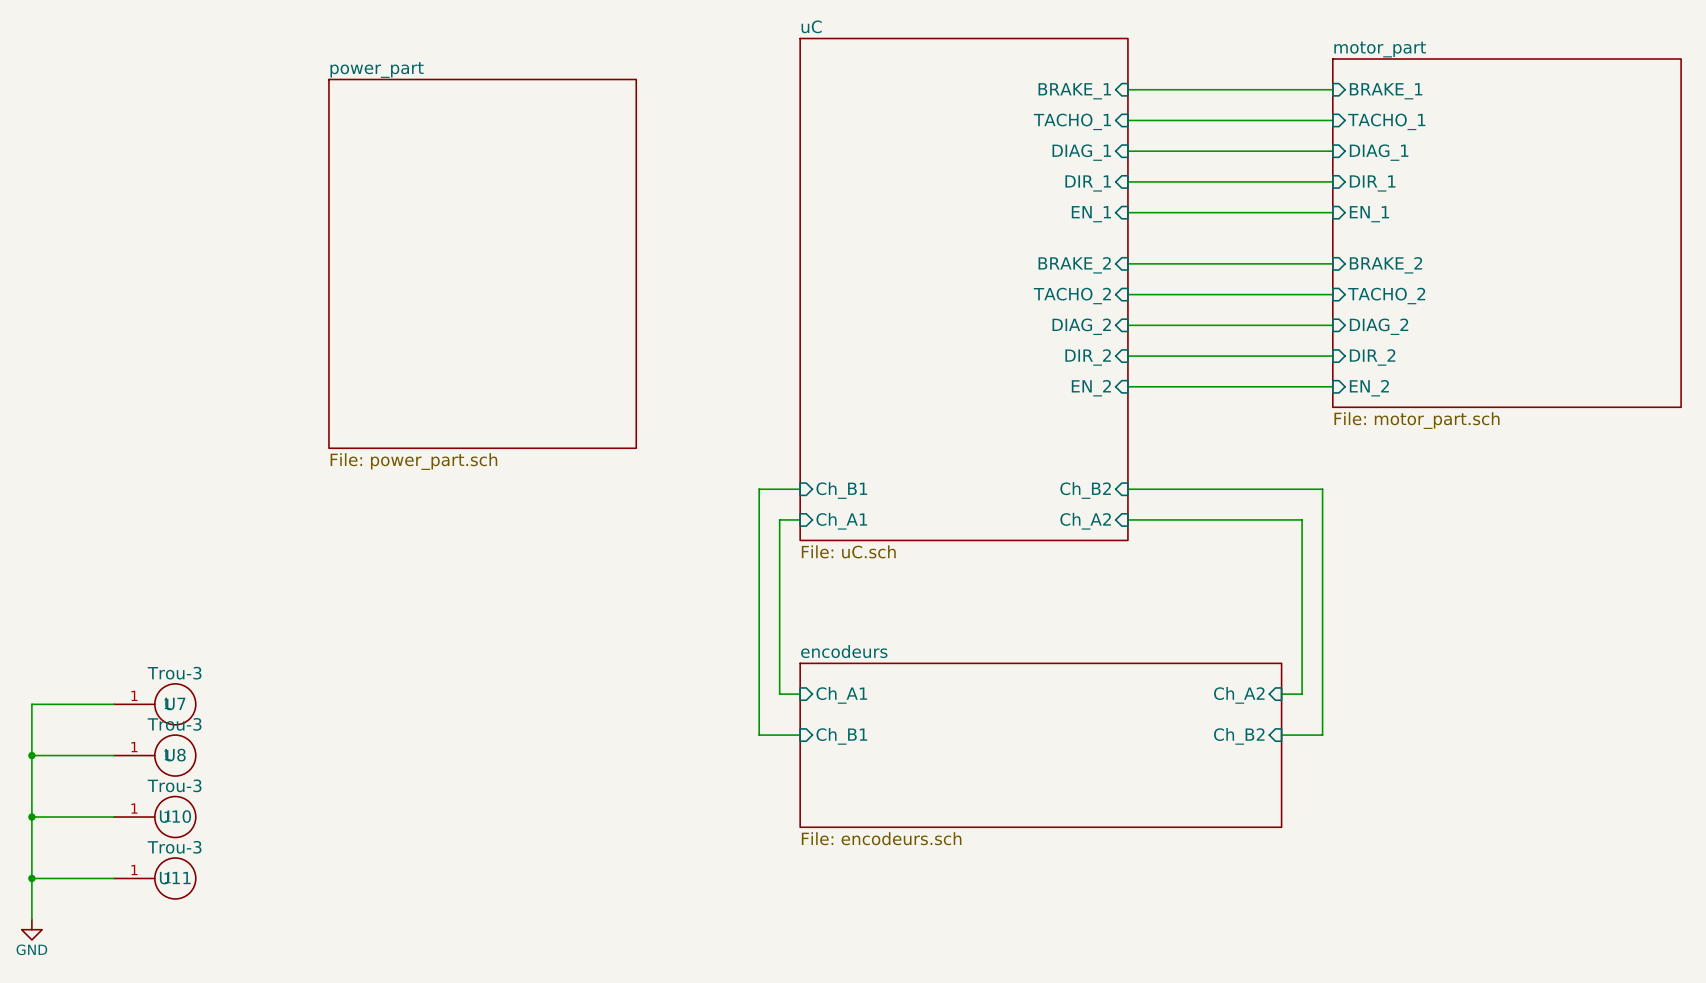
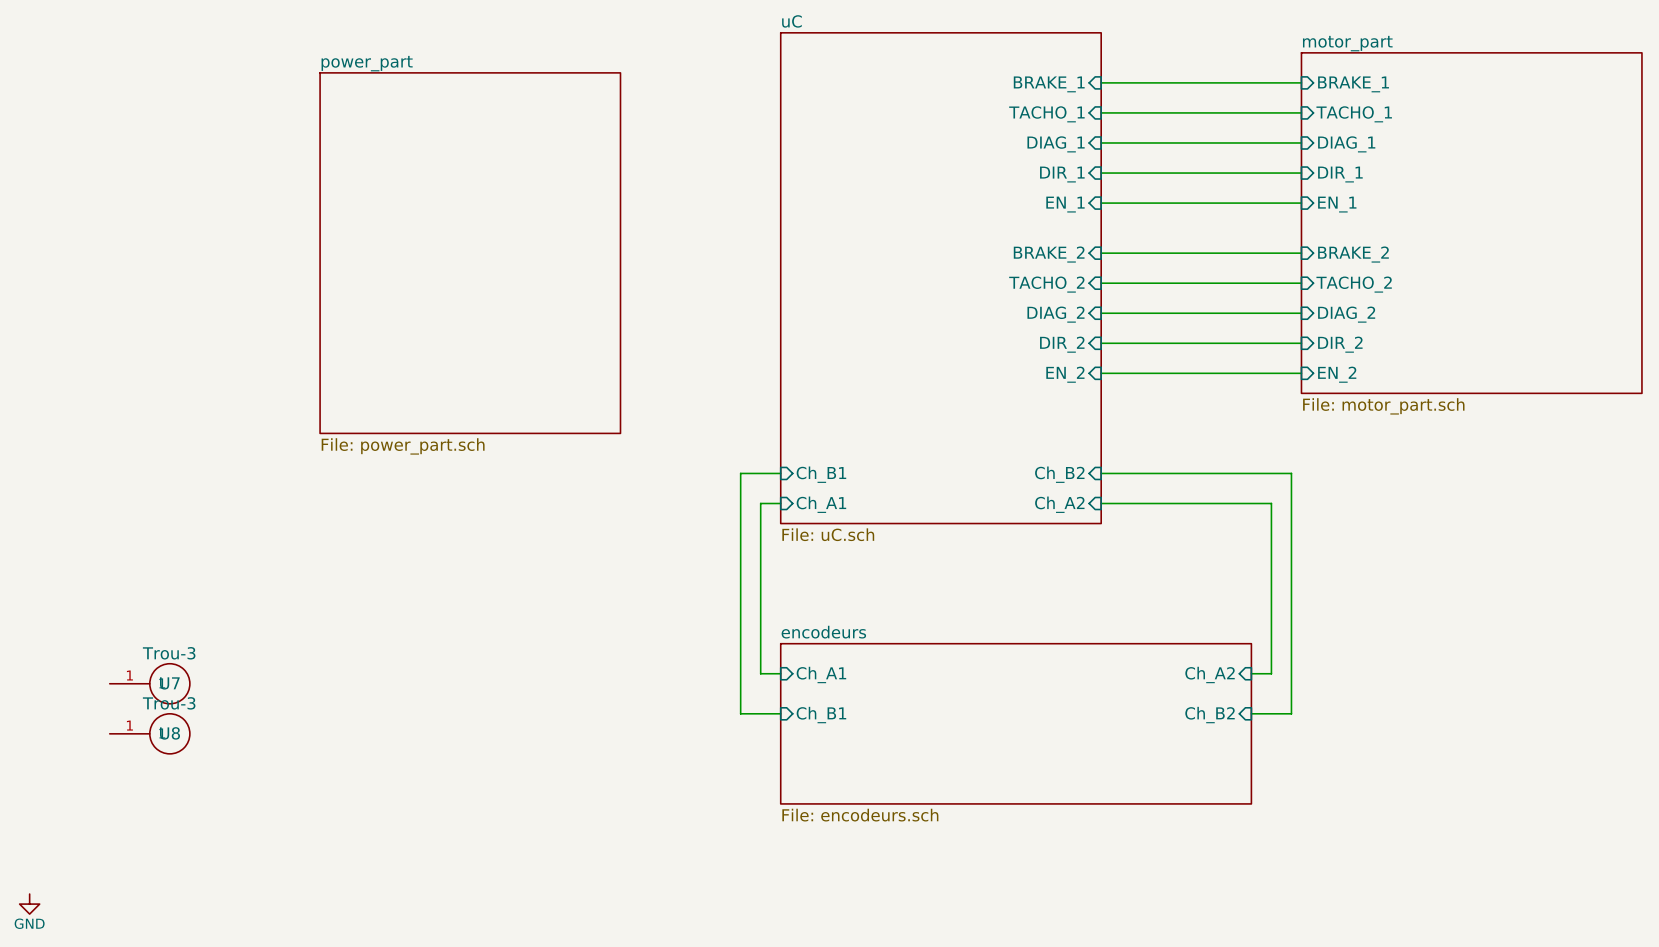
wire: (113, 704) (31, 704) (31, 919) -> none
wire: (31, 755) (113, 755) -> none
junction: (31, 755) -> none
wire: (31, 817) (113, 817) -> none
junction: (31, 817) -> none
U10: Trou-3 (154, 817) -> none
wire: (31, 878) (113, 878) -> none
junction: (31, 878) -> none
U11: Trou-3 (154, 878) -> none

